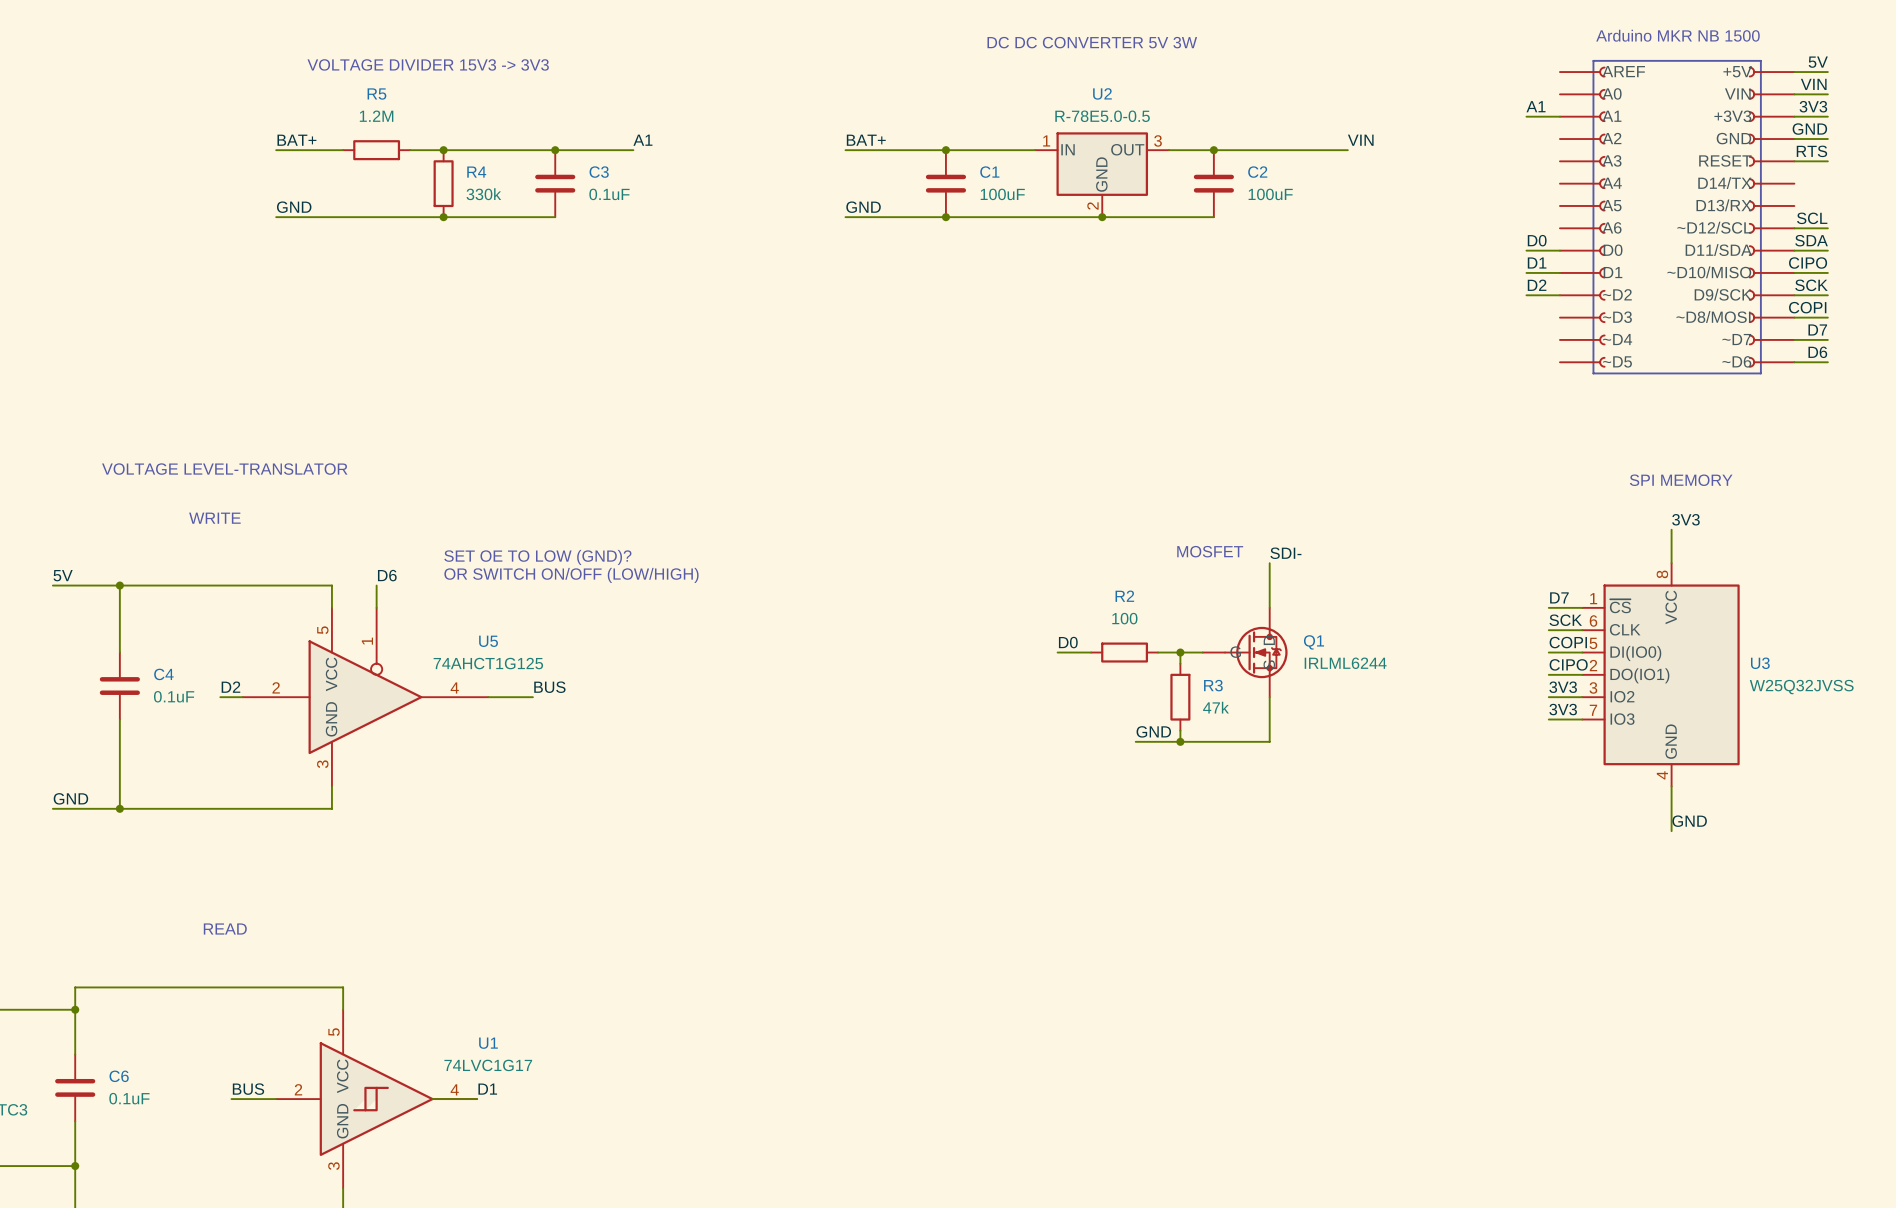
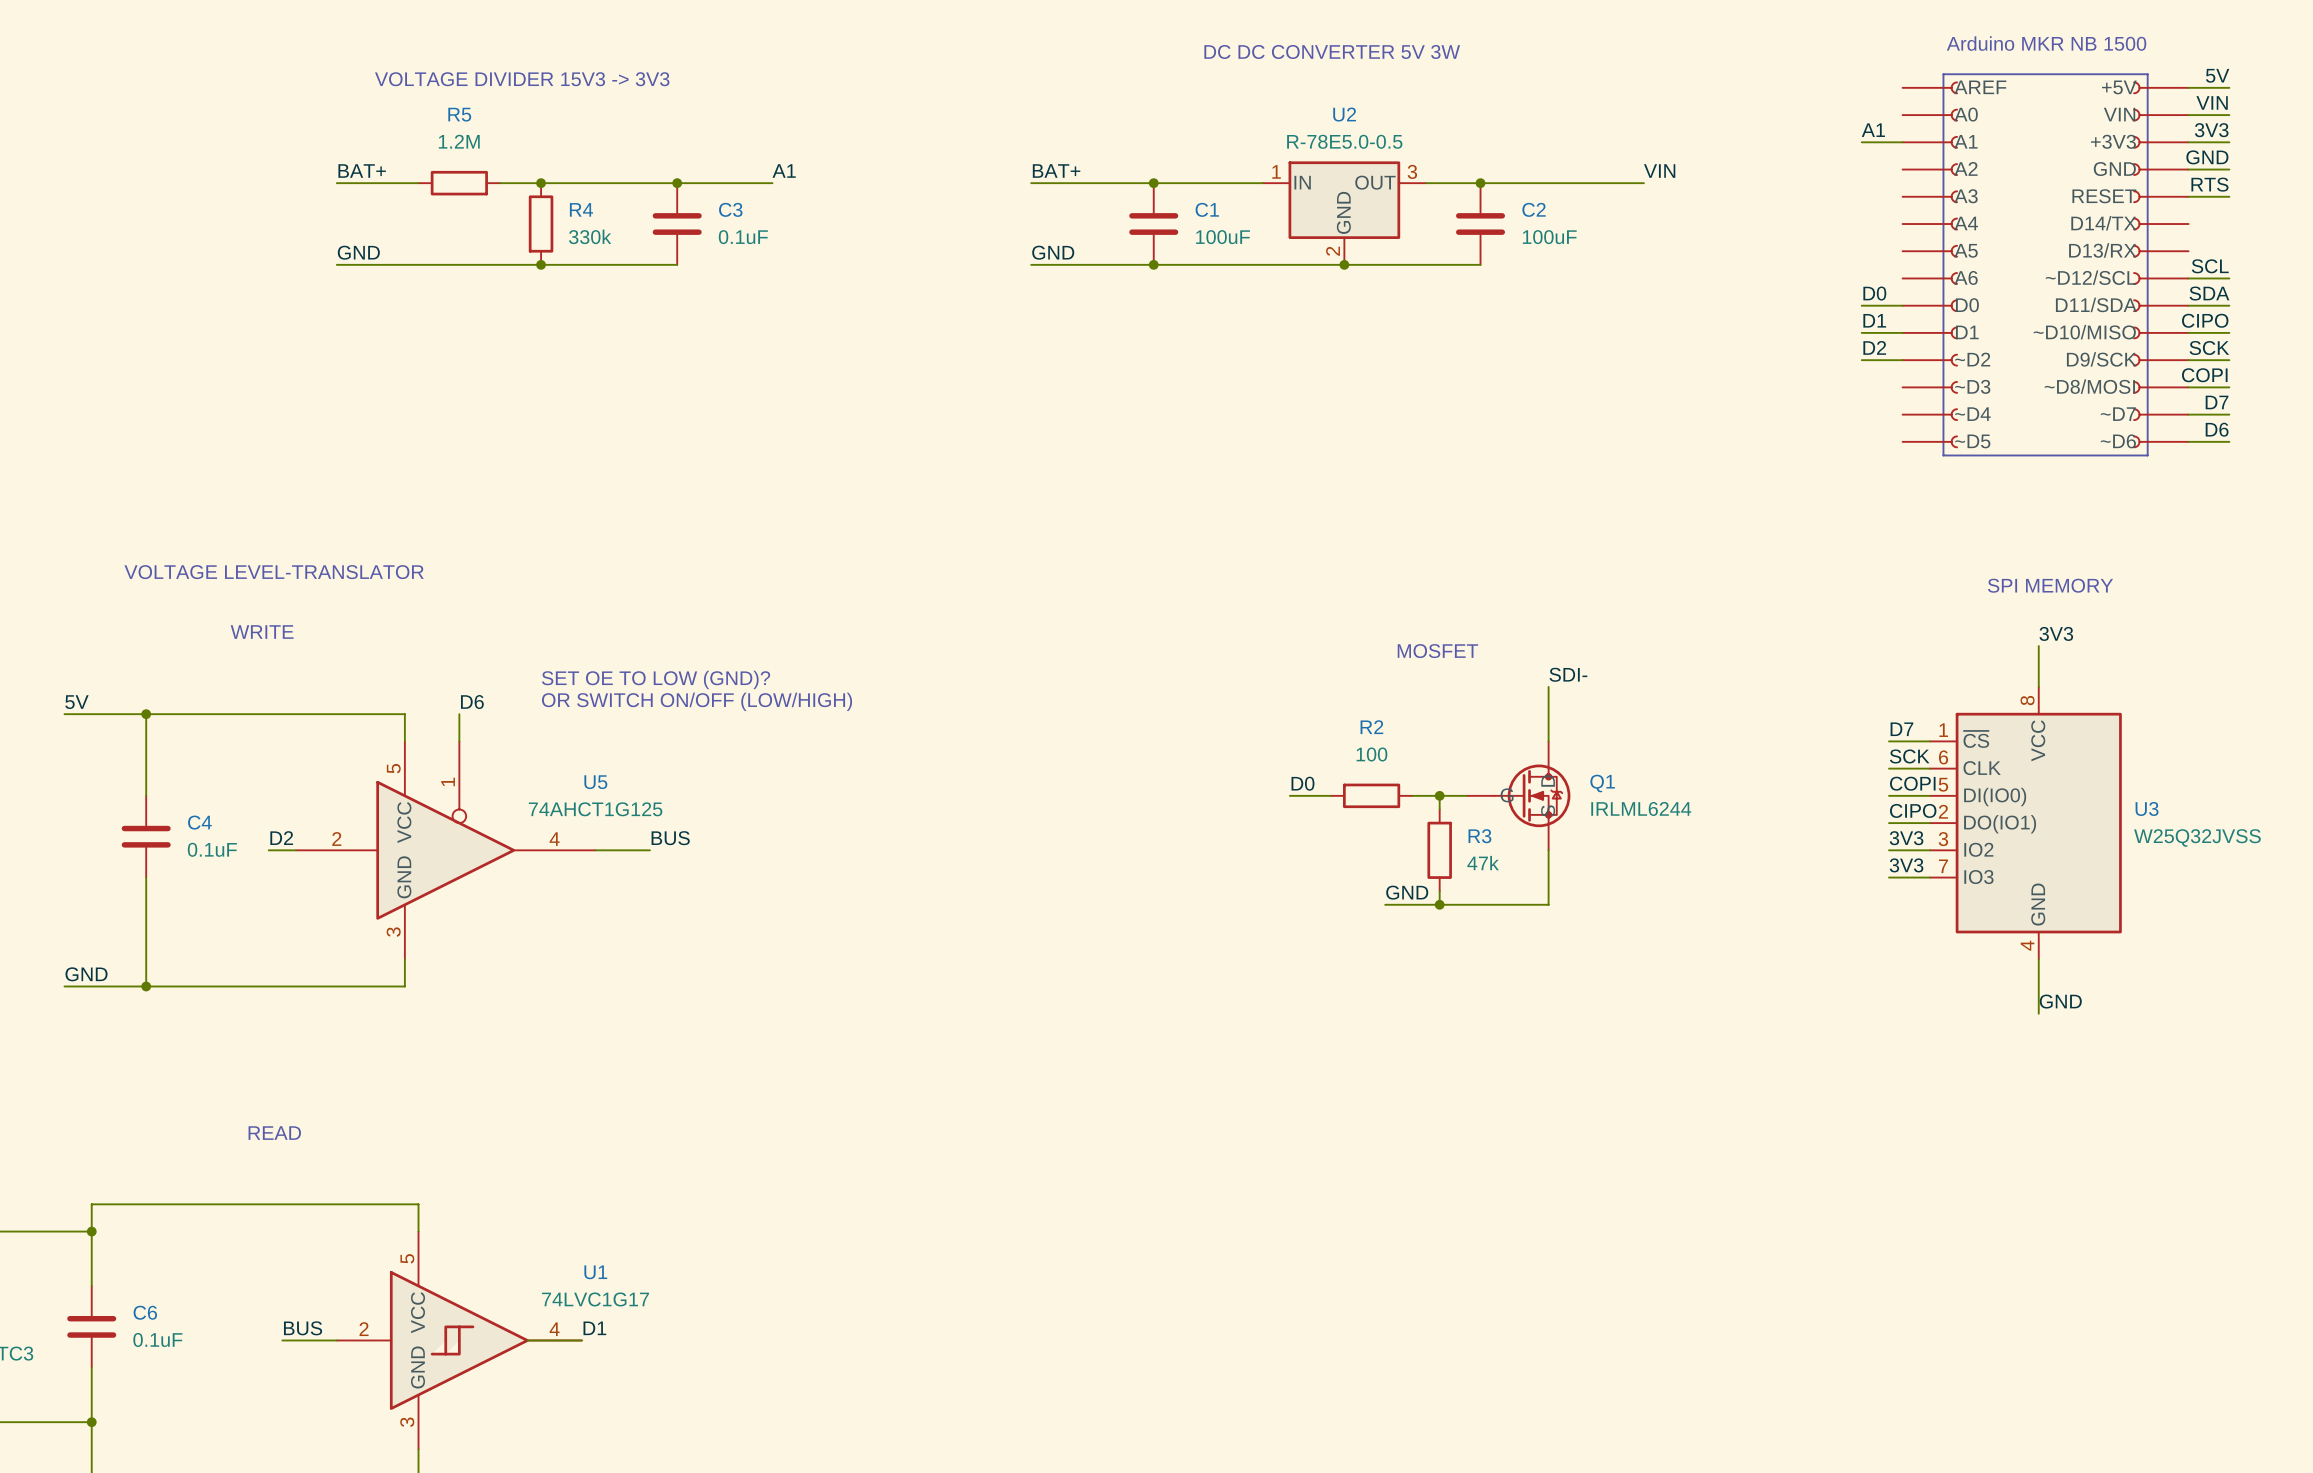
text position: MOSFET (1210, 551) -> MOSFET (1437, 651)

